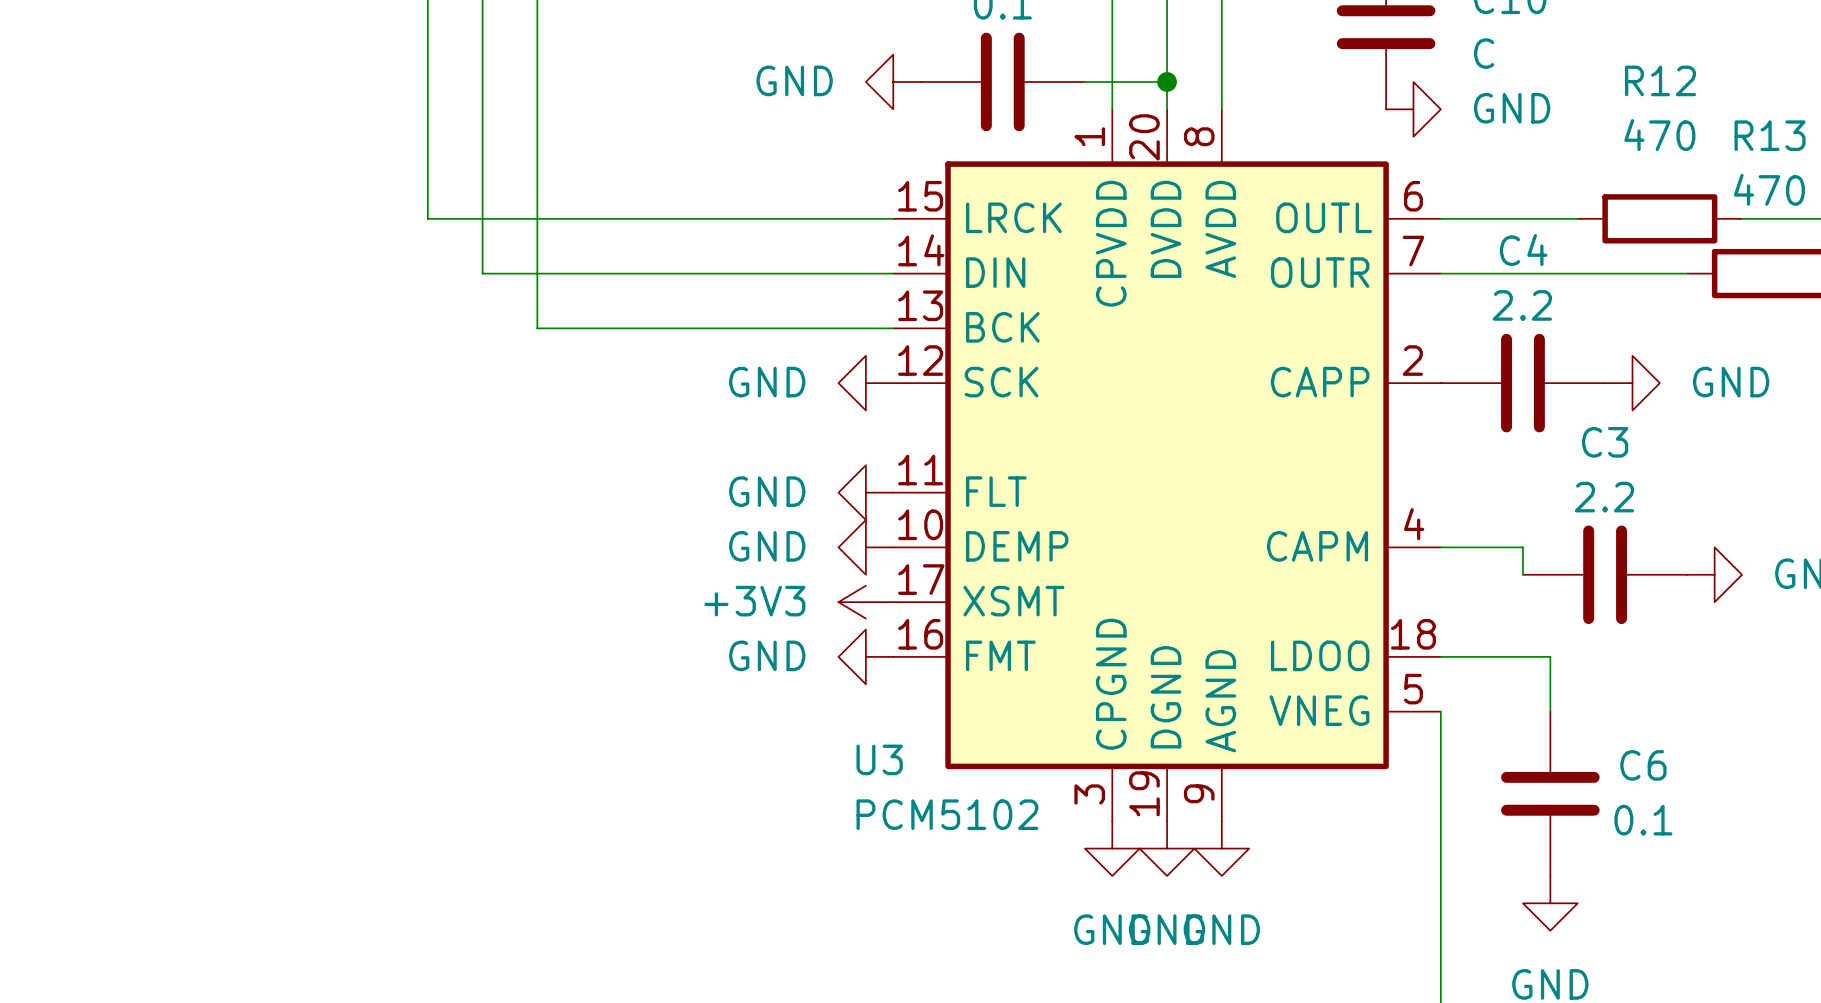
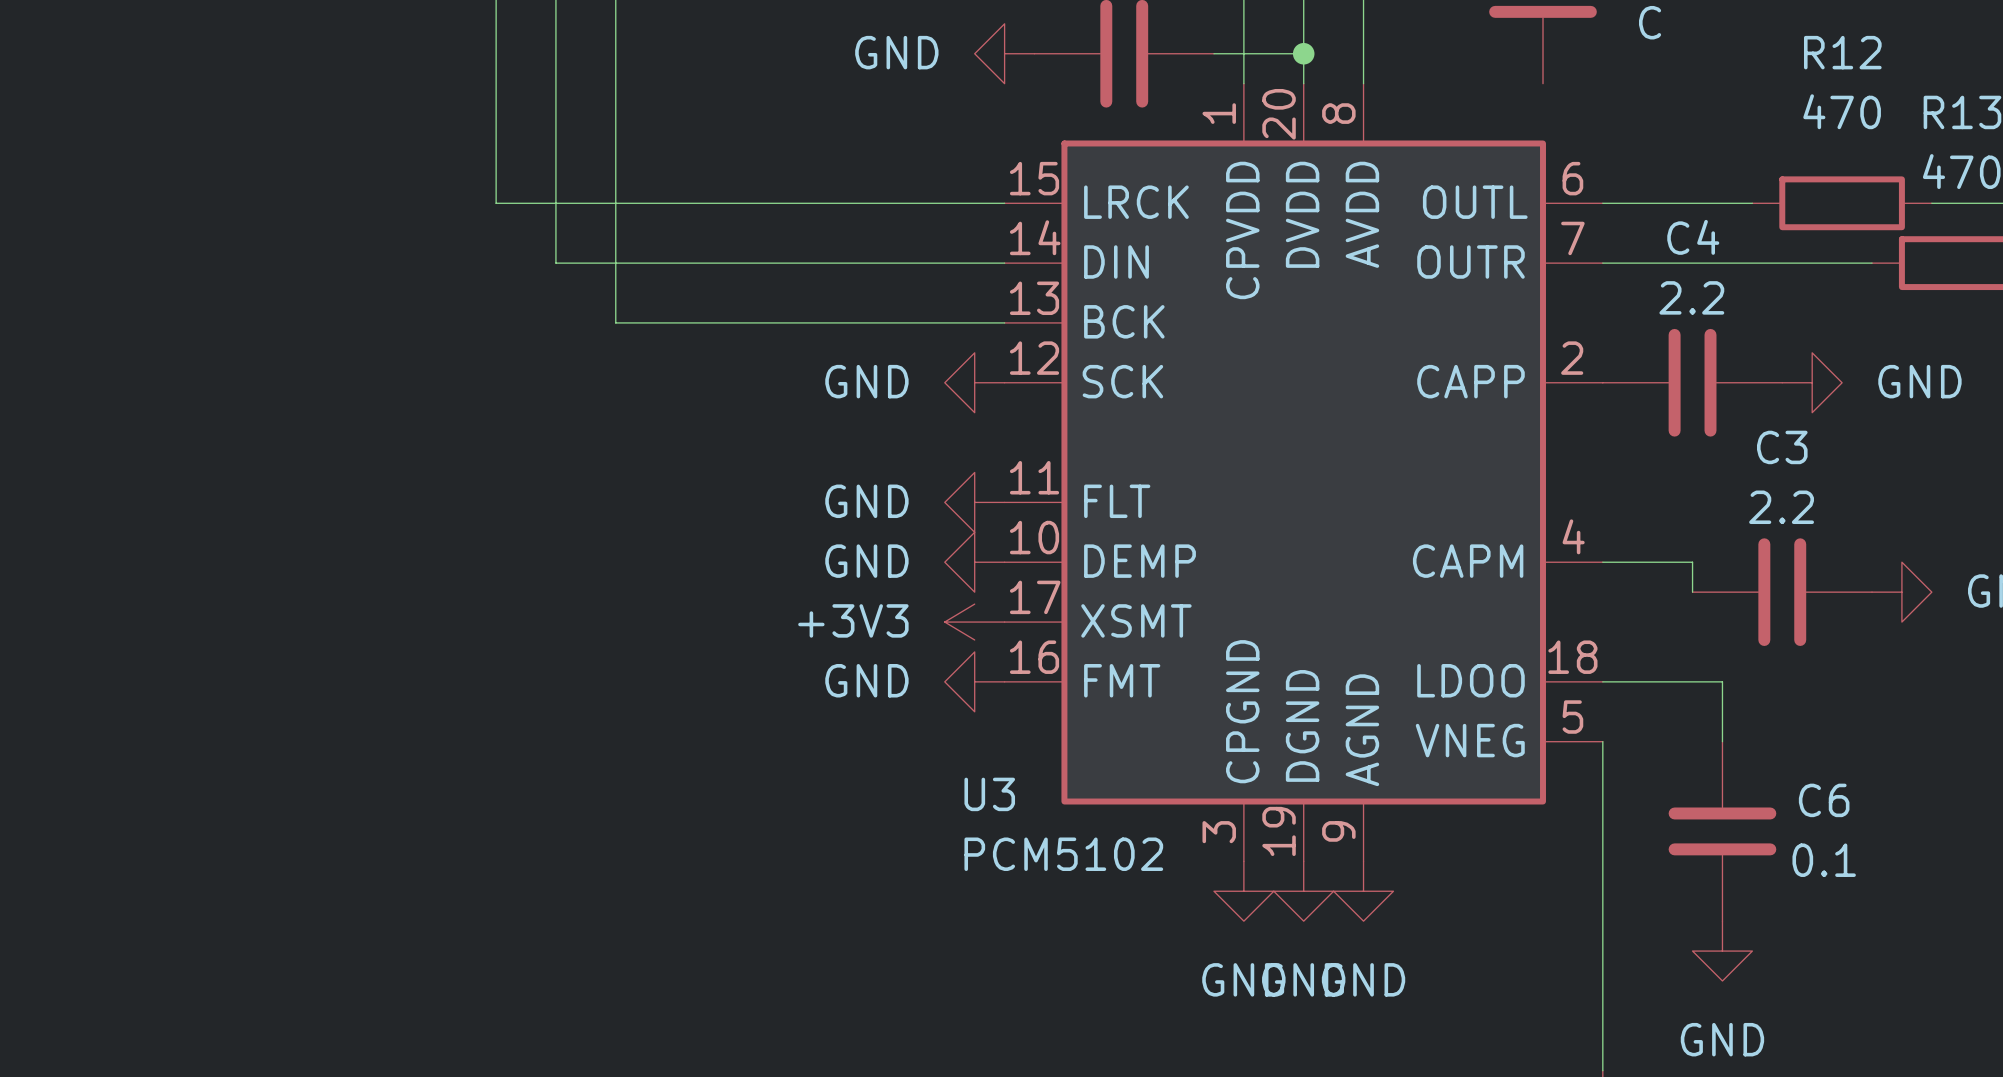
power symbol: GND (1413, 109) -> none

